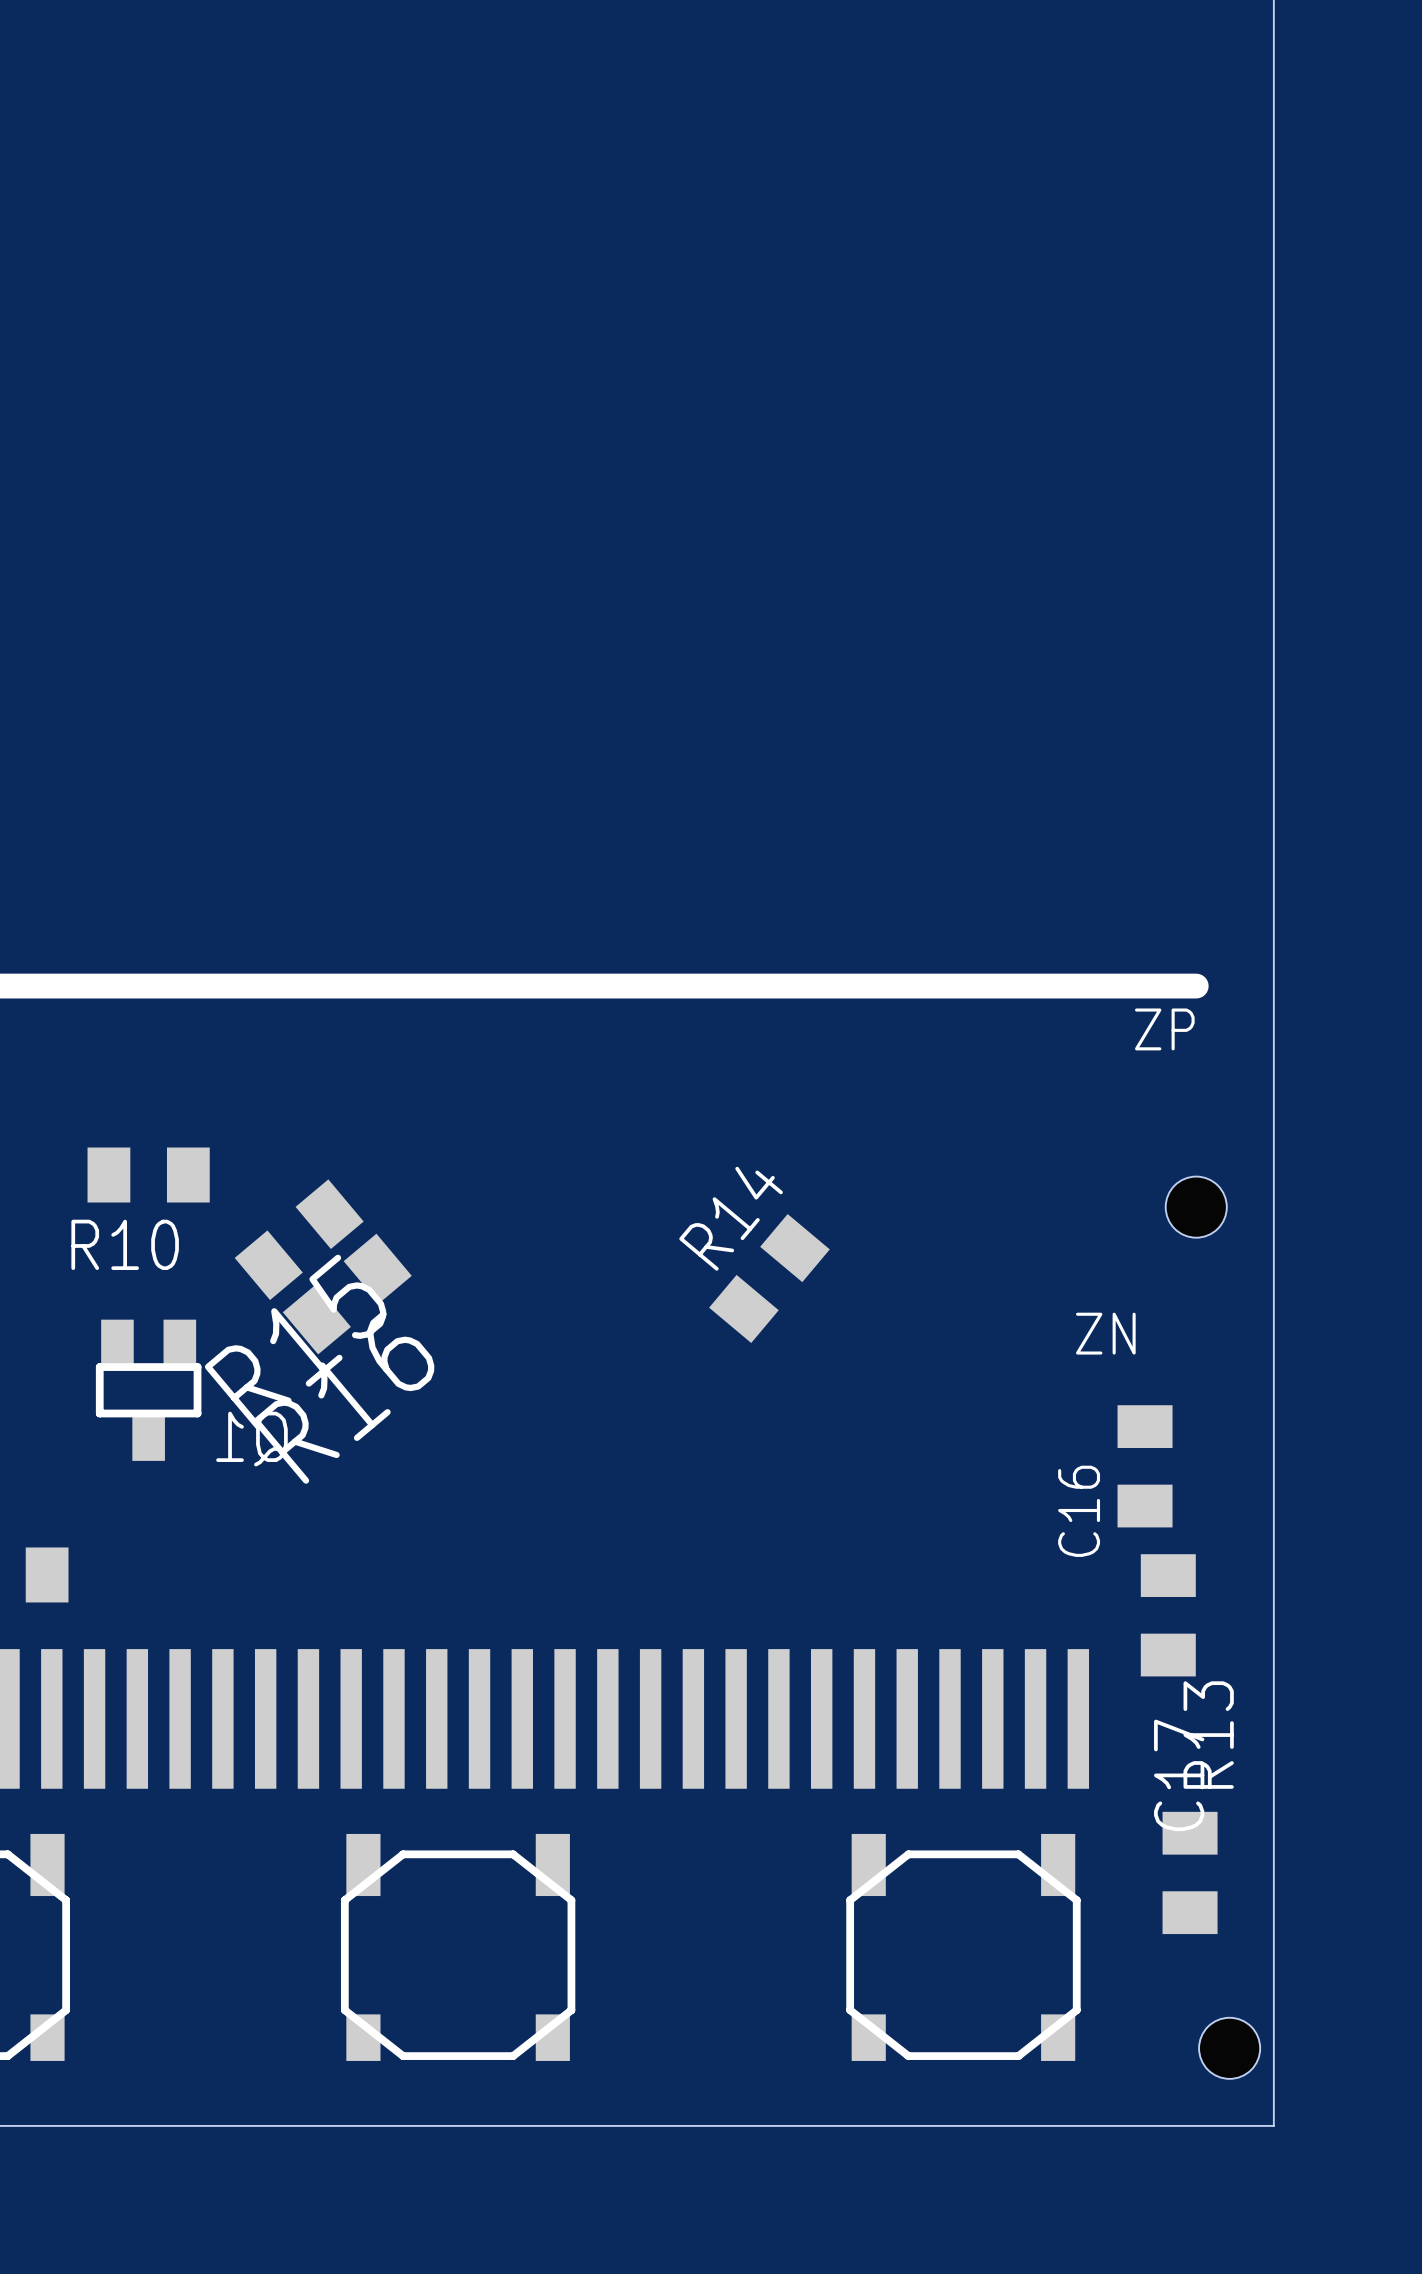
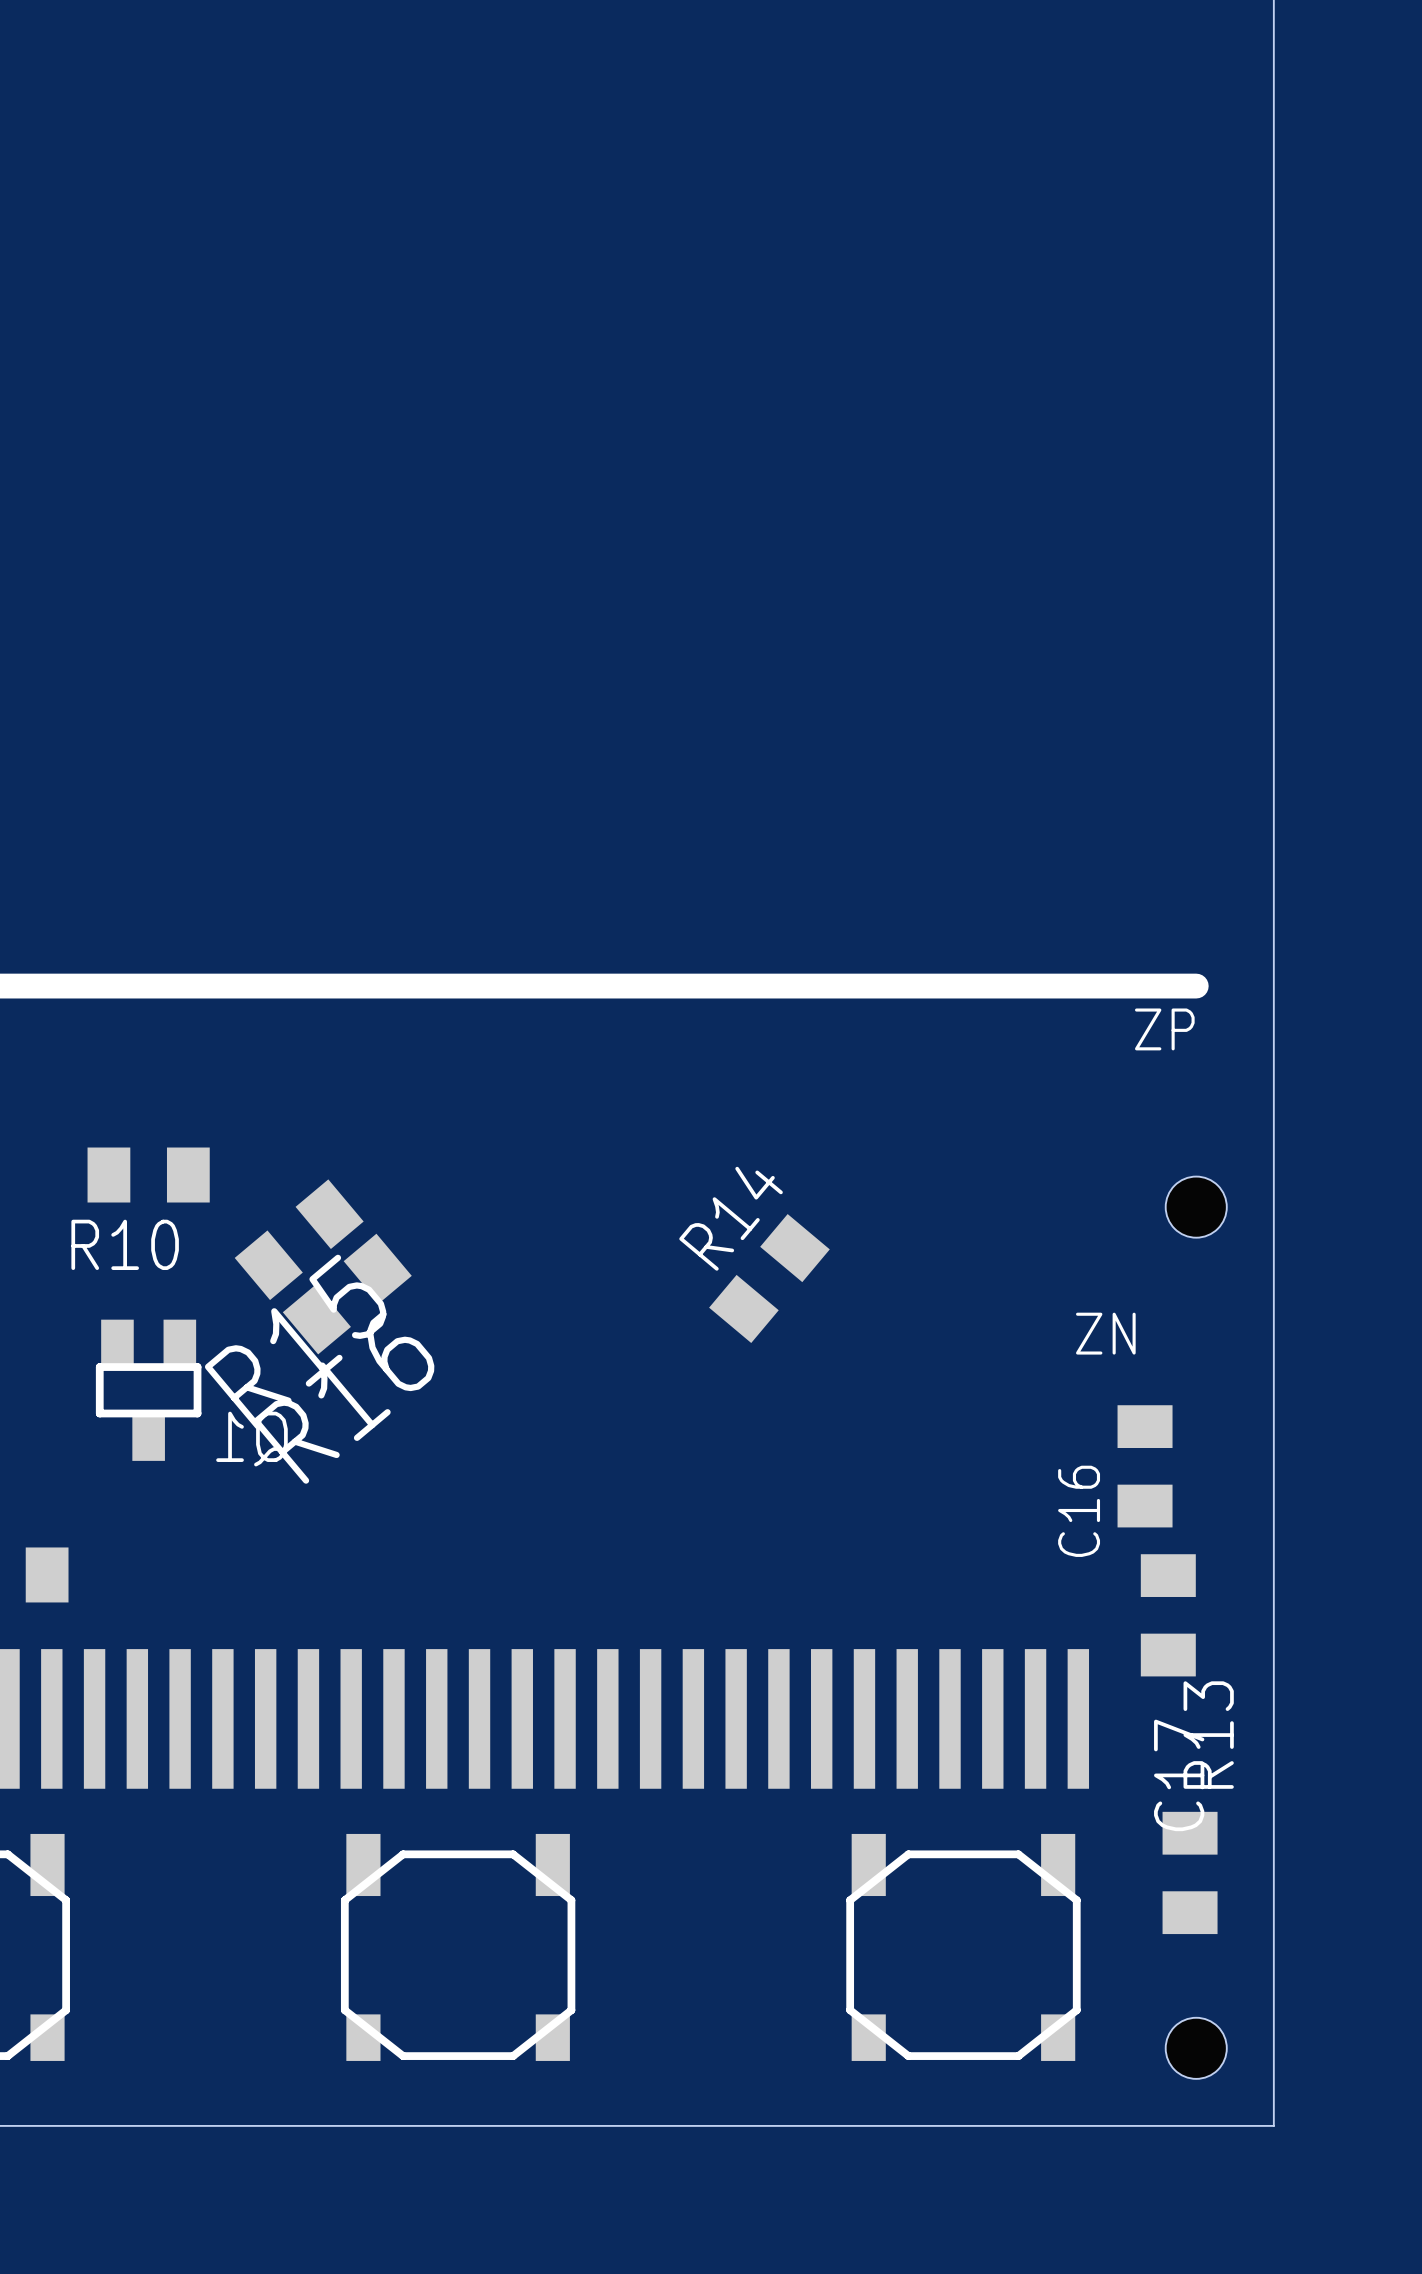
hole position: (1229, 2048) -> (1196, 2048)

